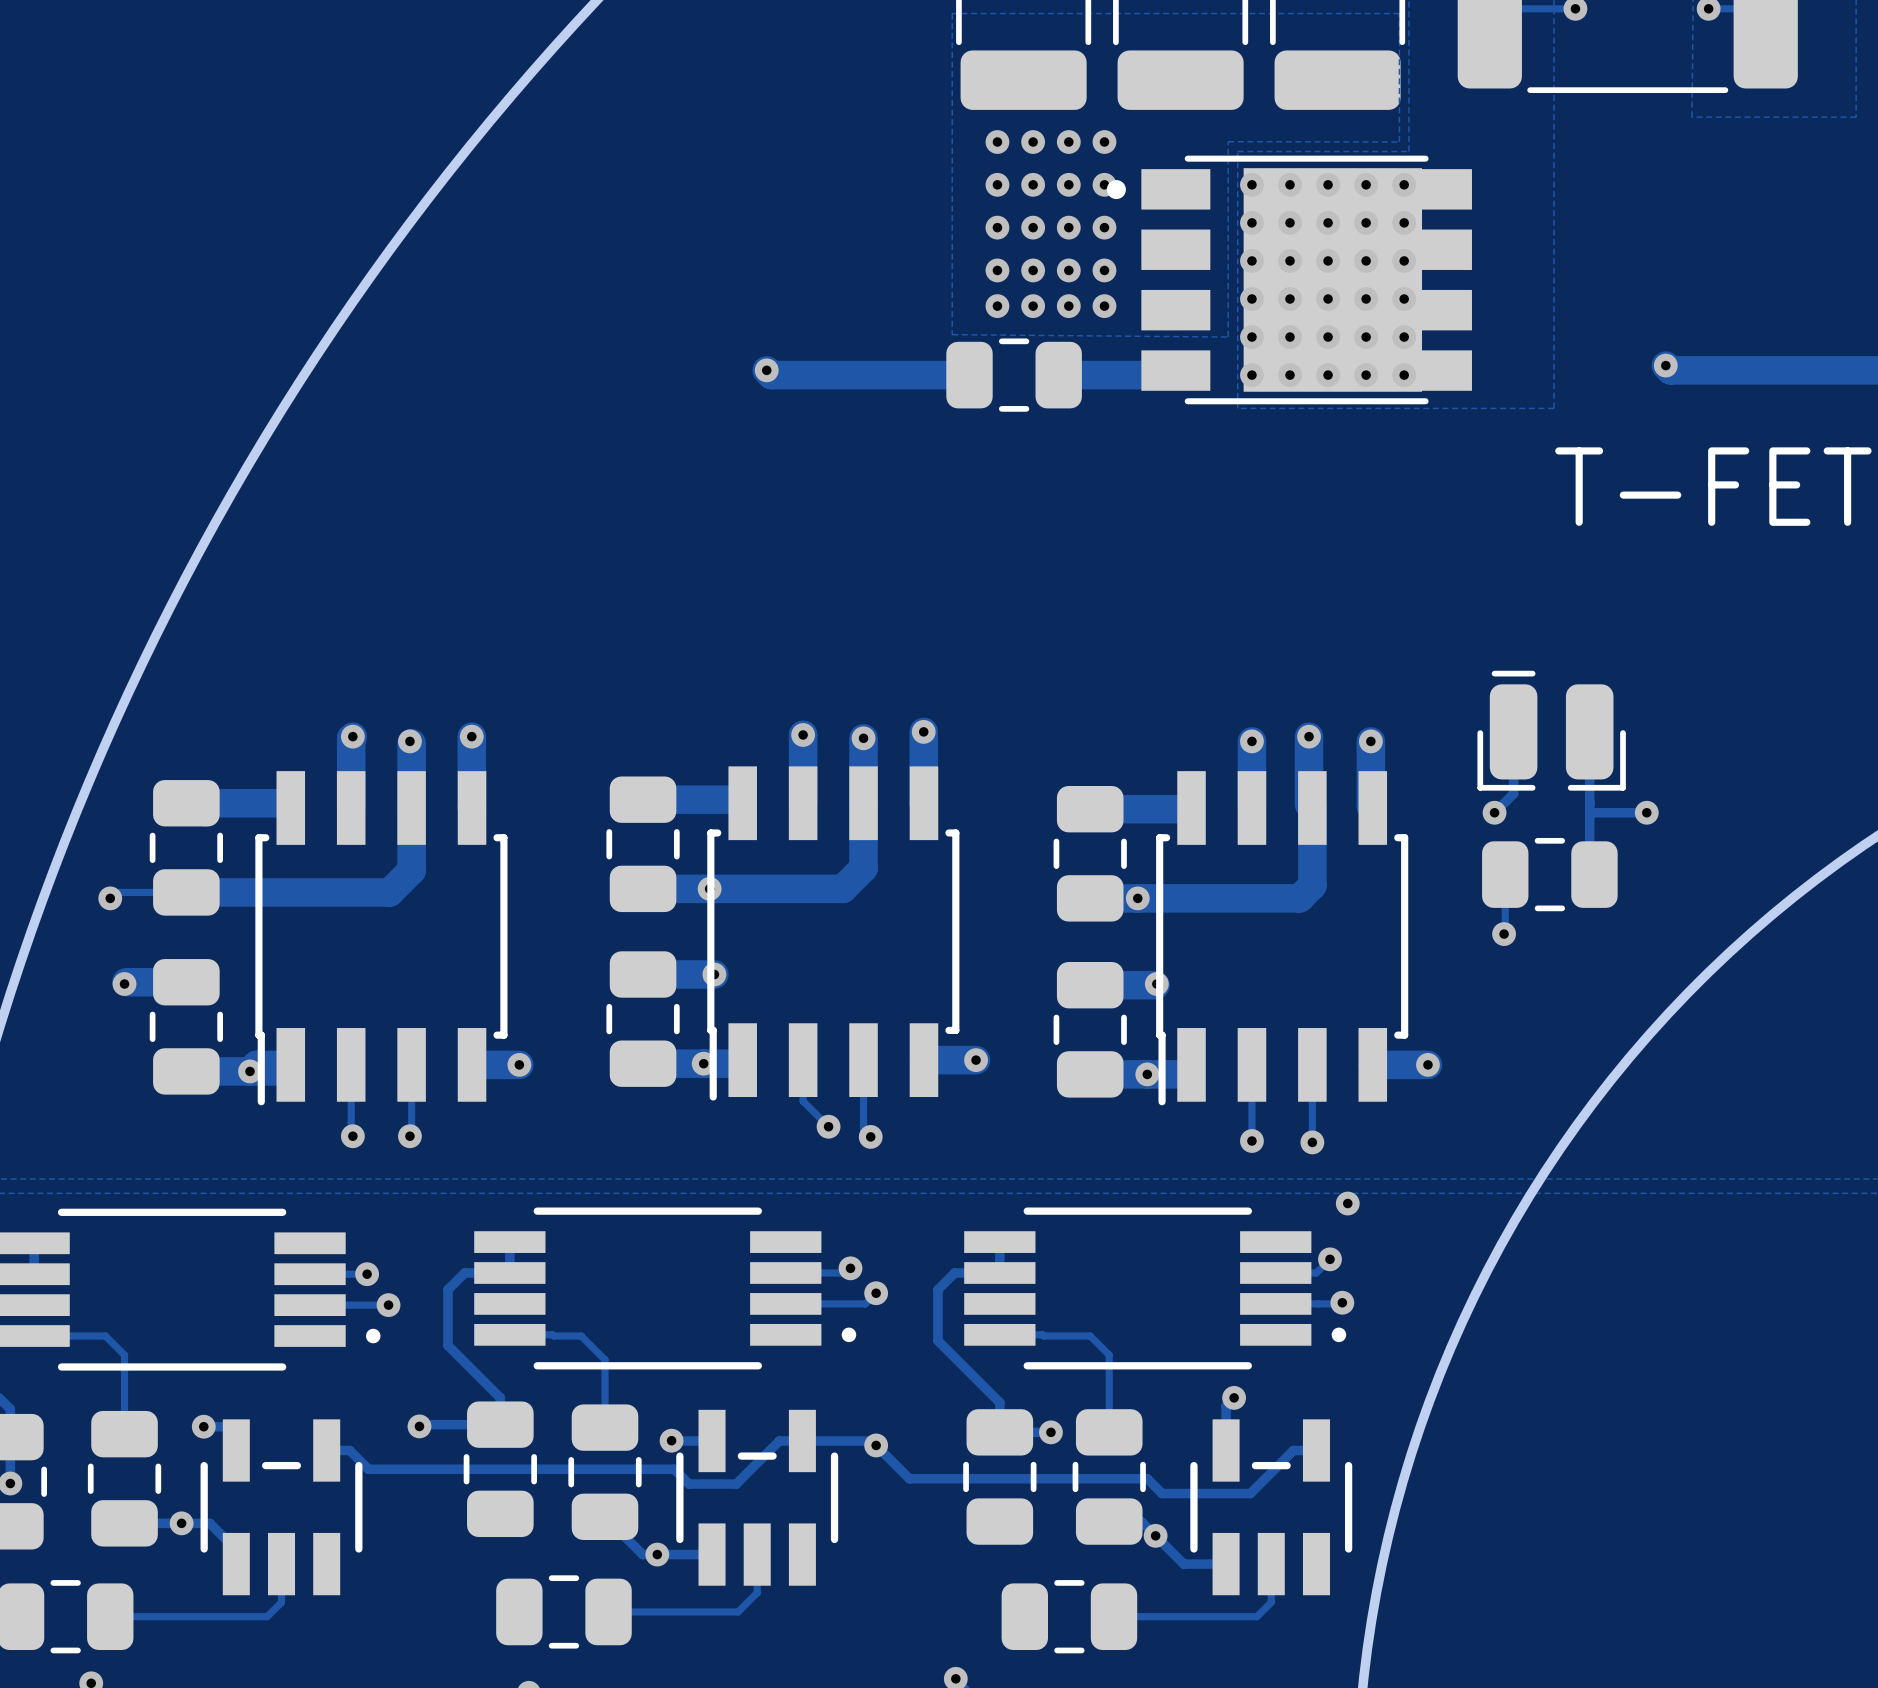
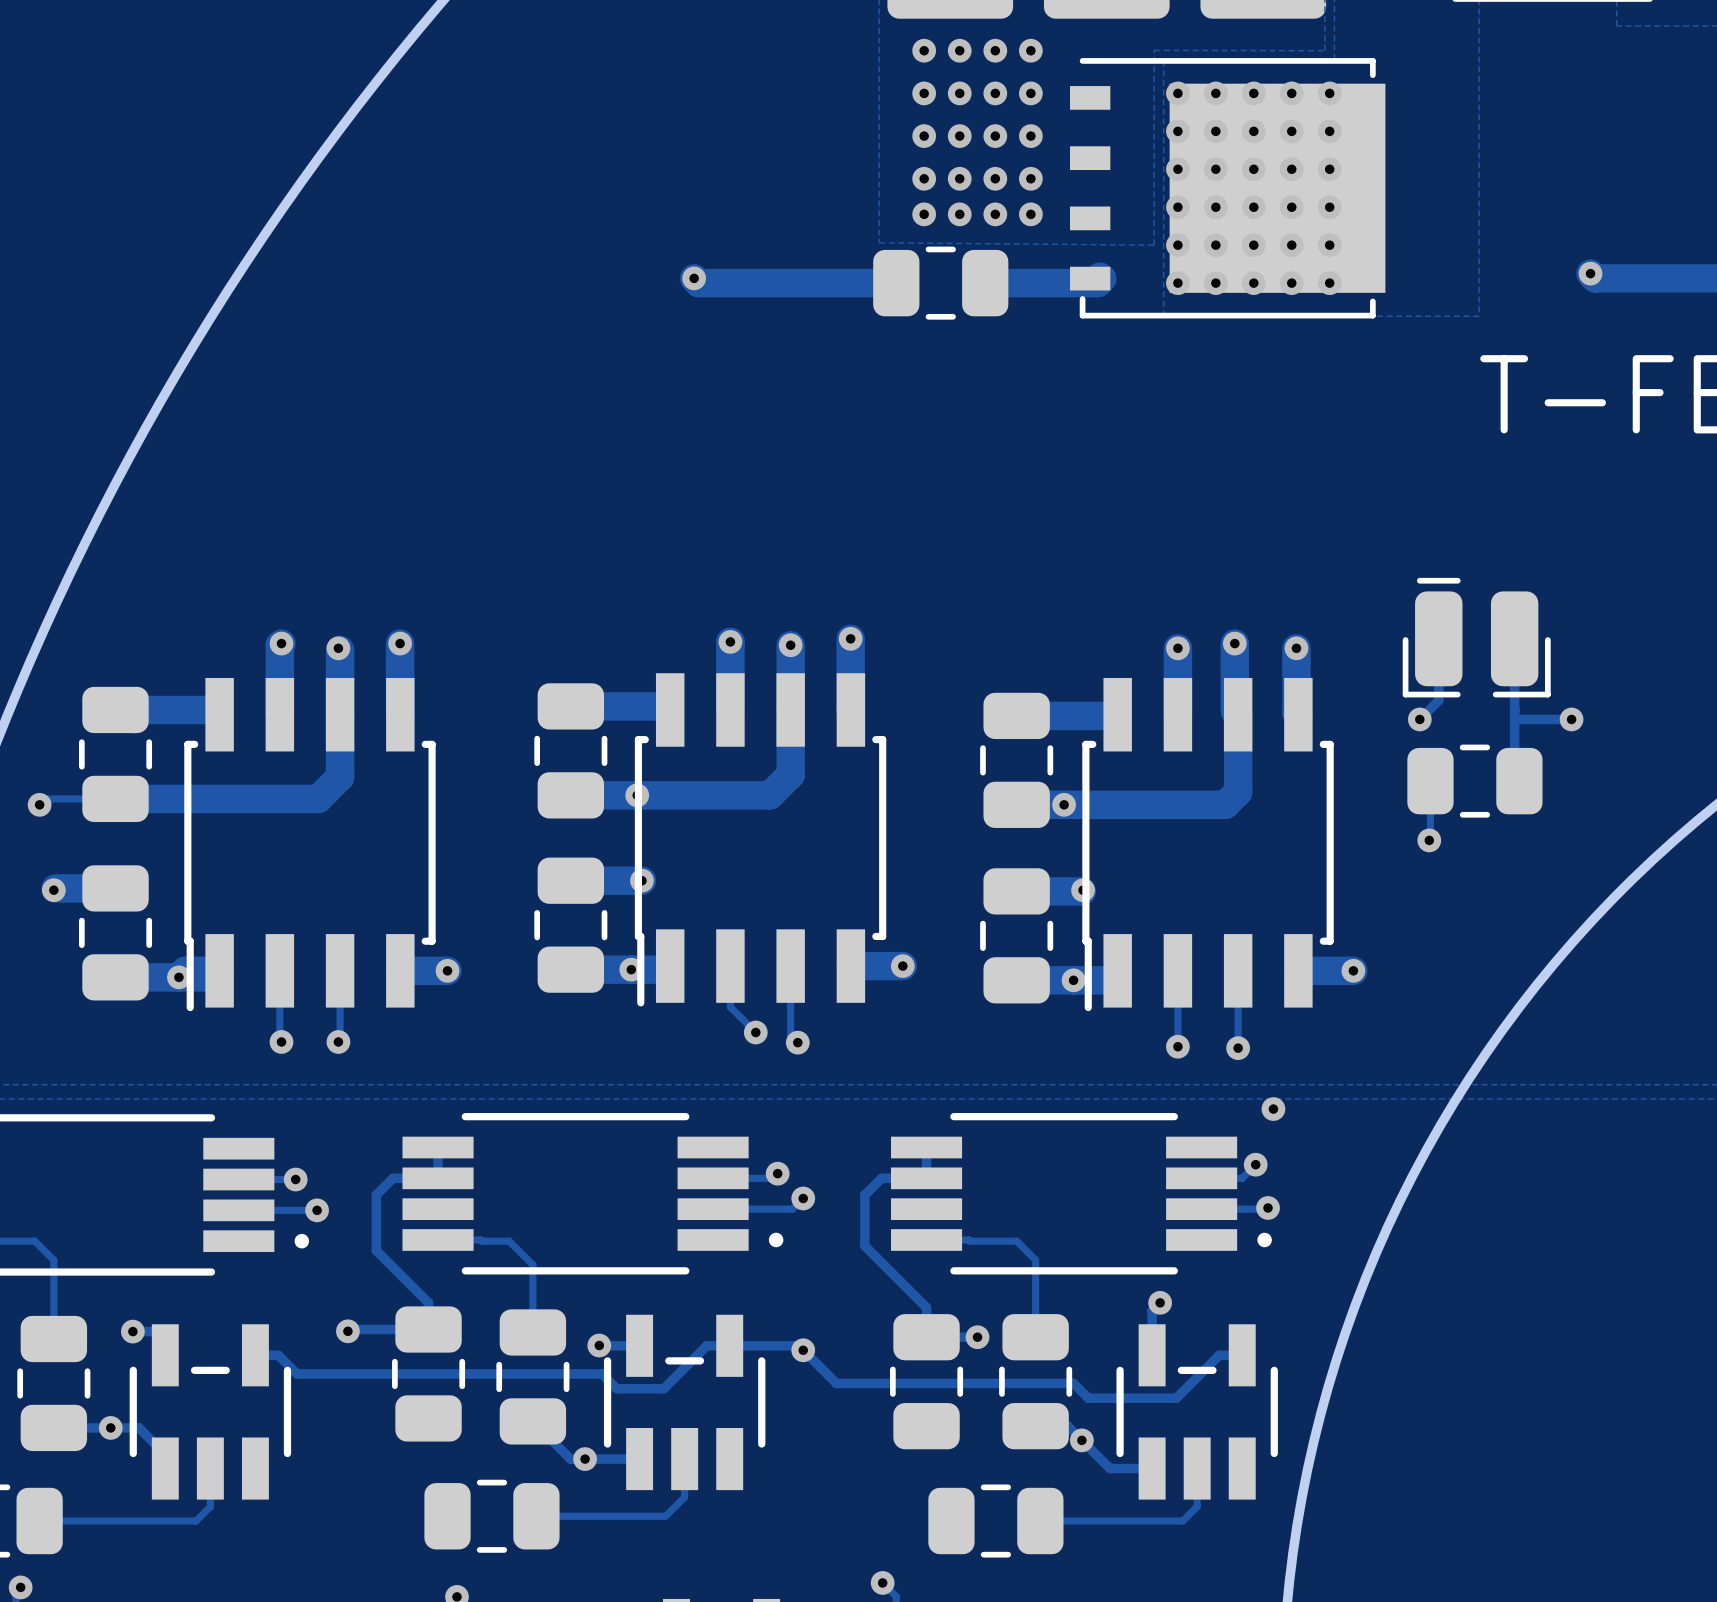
part footprint: [1106, 155, 1472, 405] -> [1070, 58, 1386, 319]

